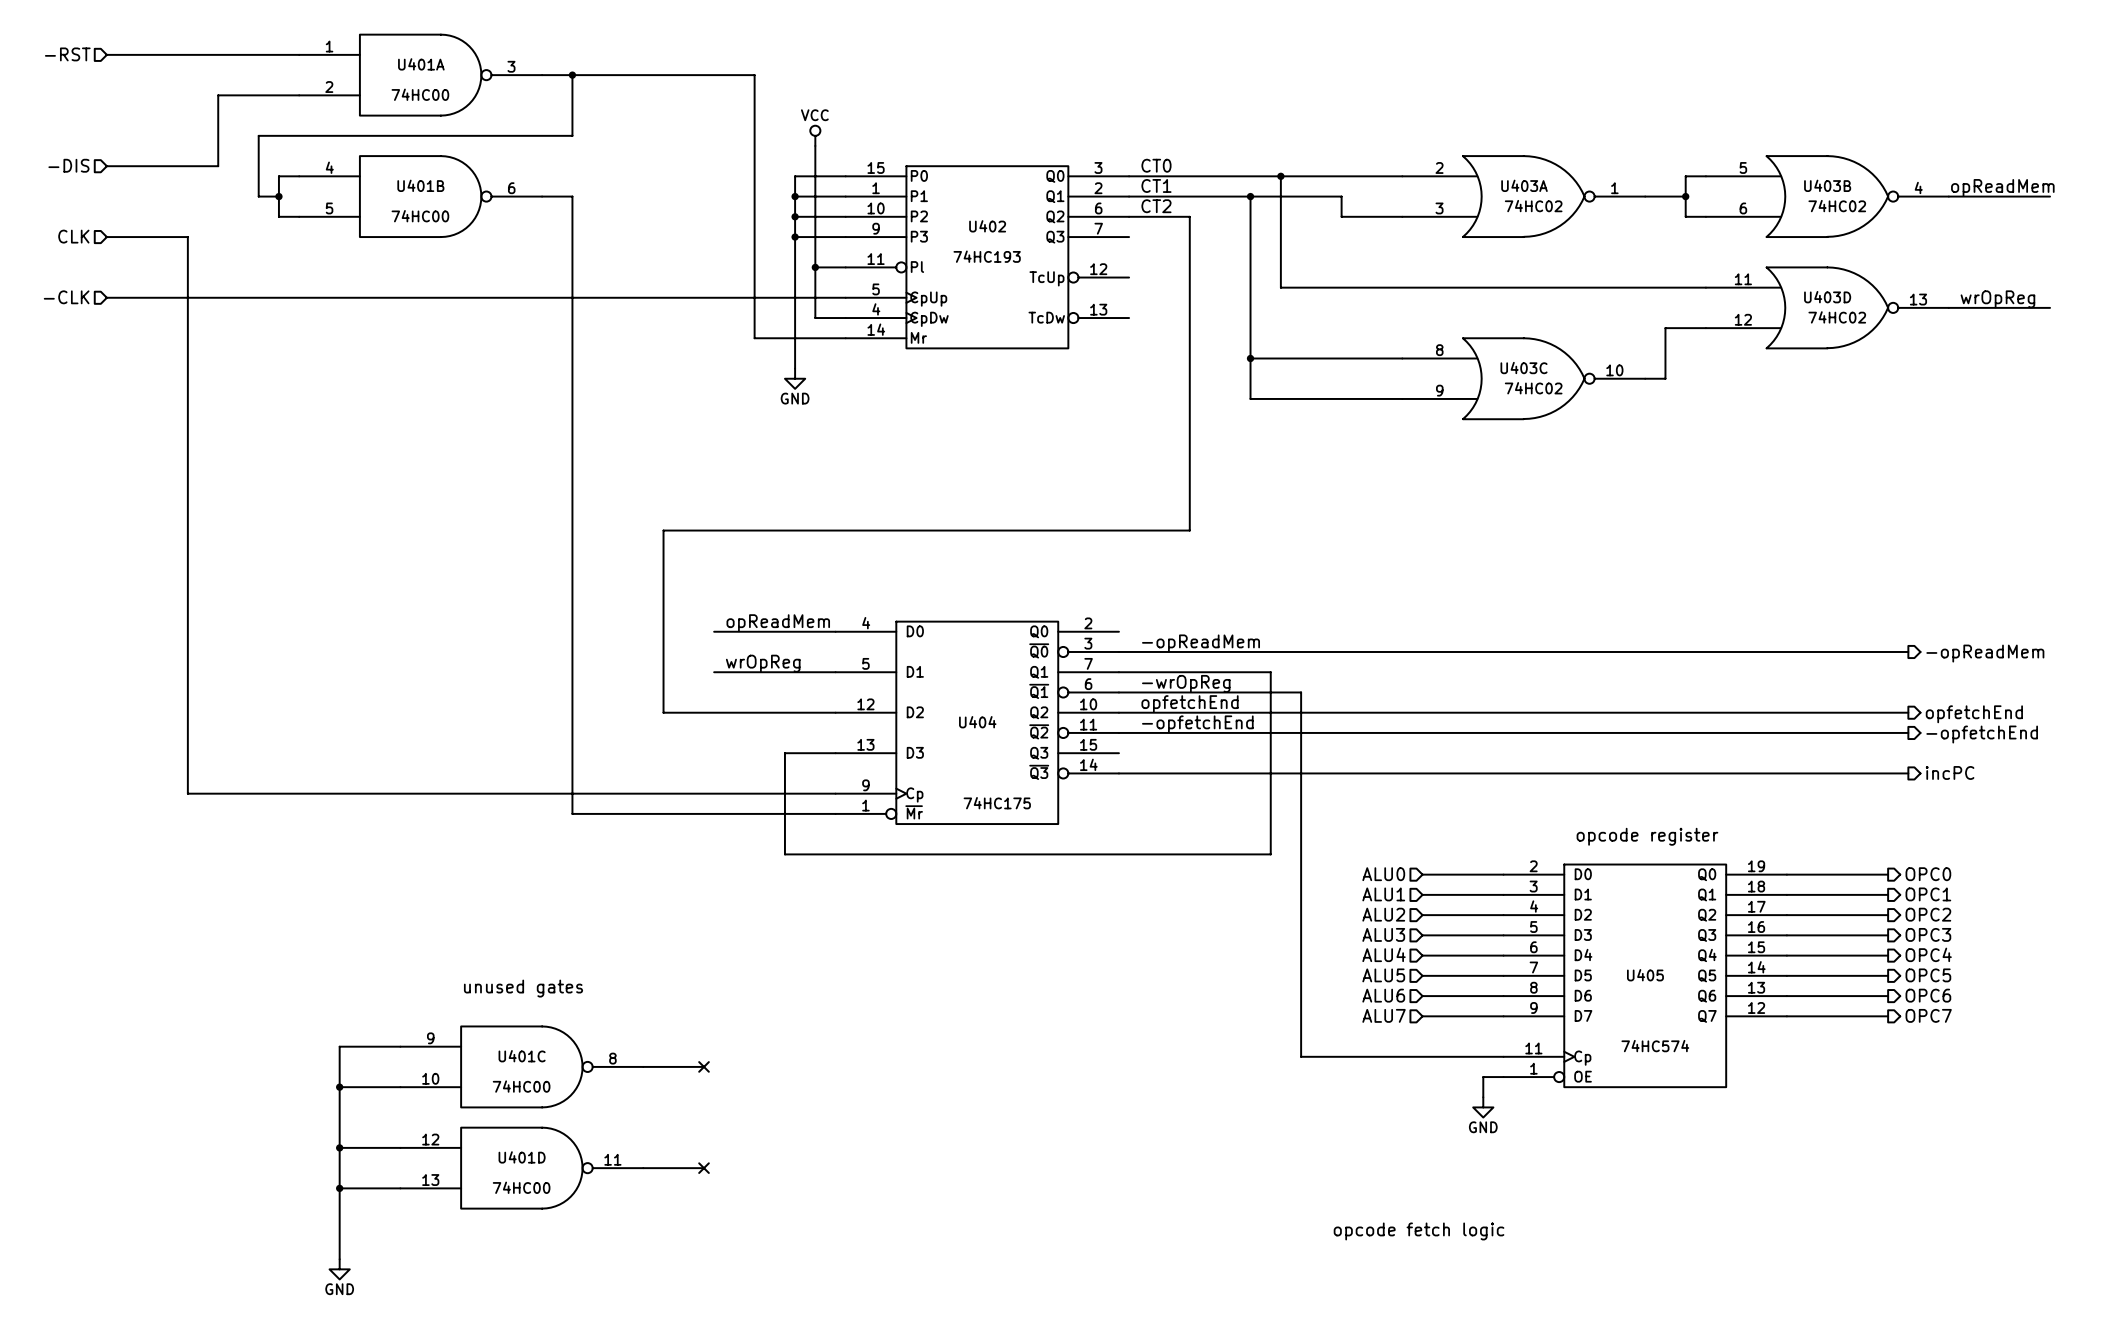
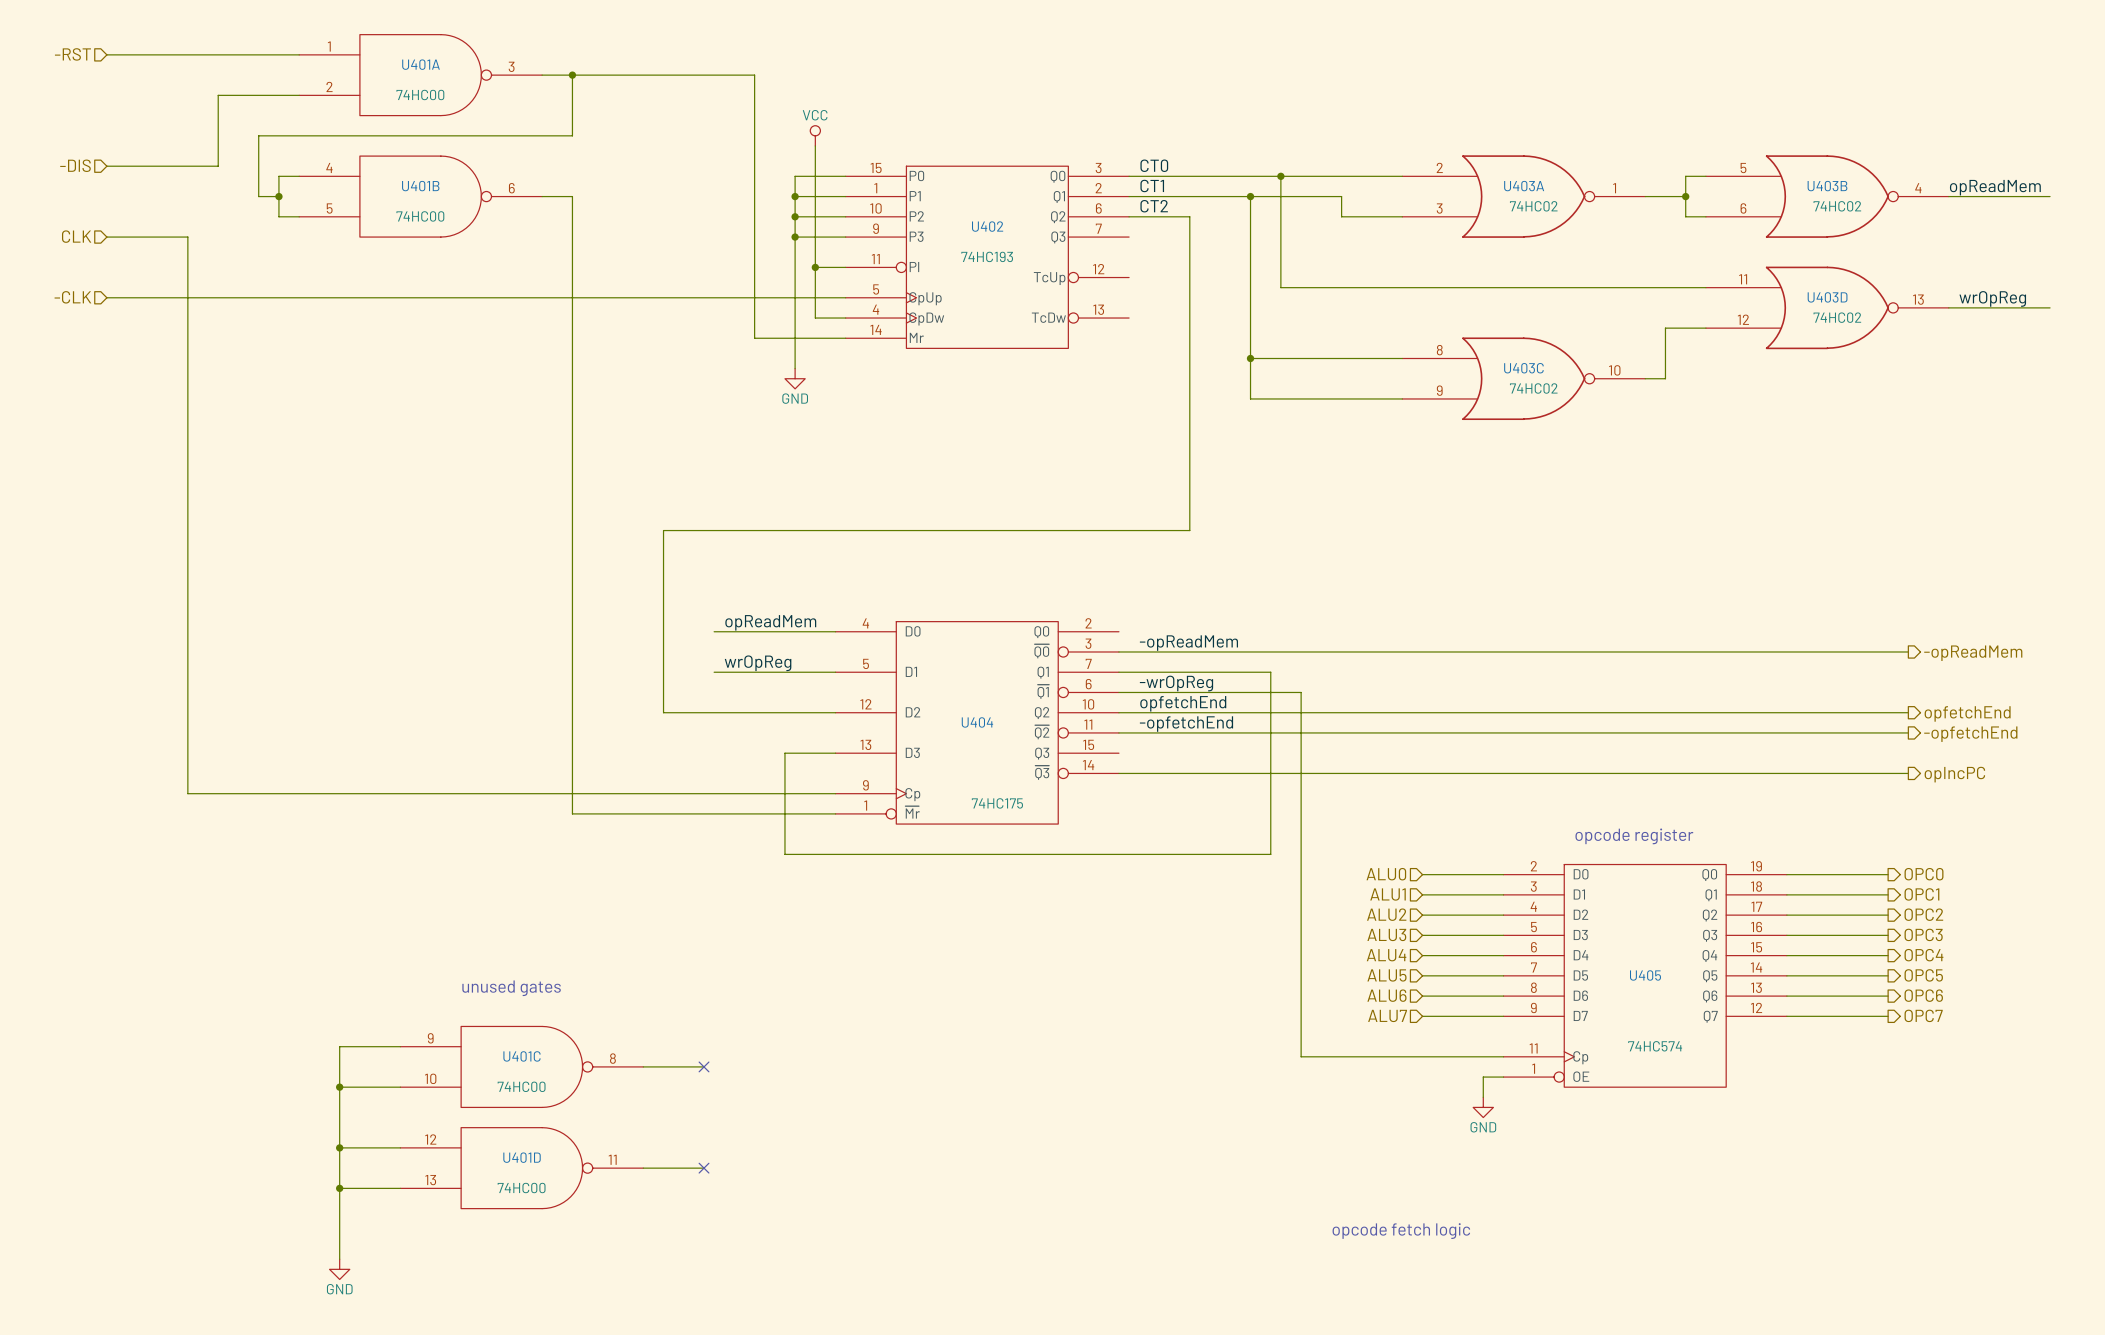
hierarchical label: incPC (1950, 772) -> opIncPC (1954, 774)

